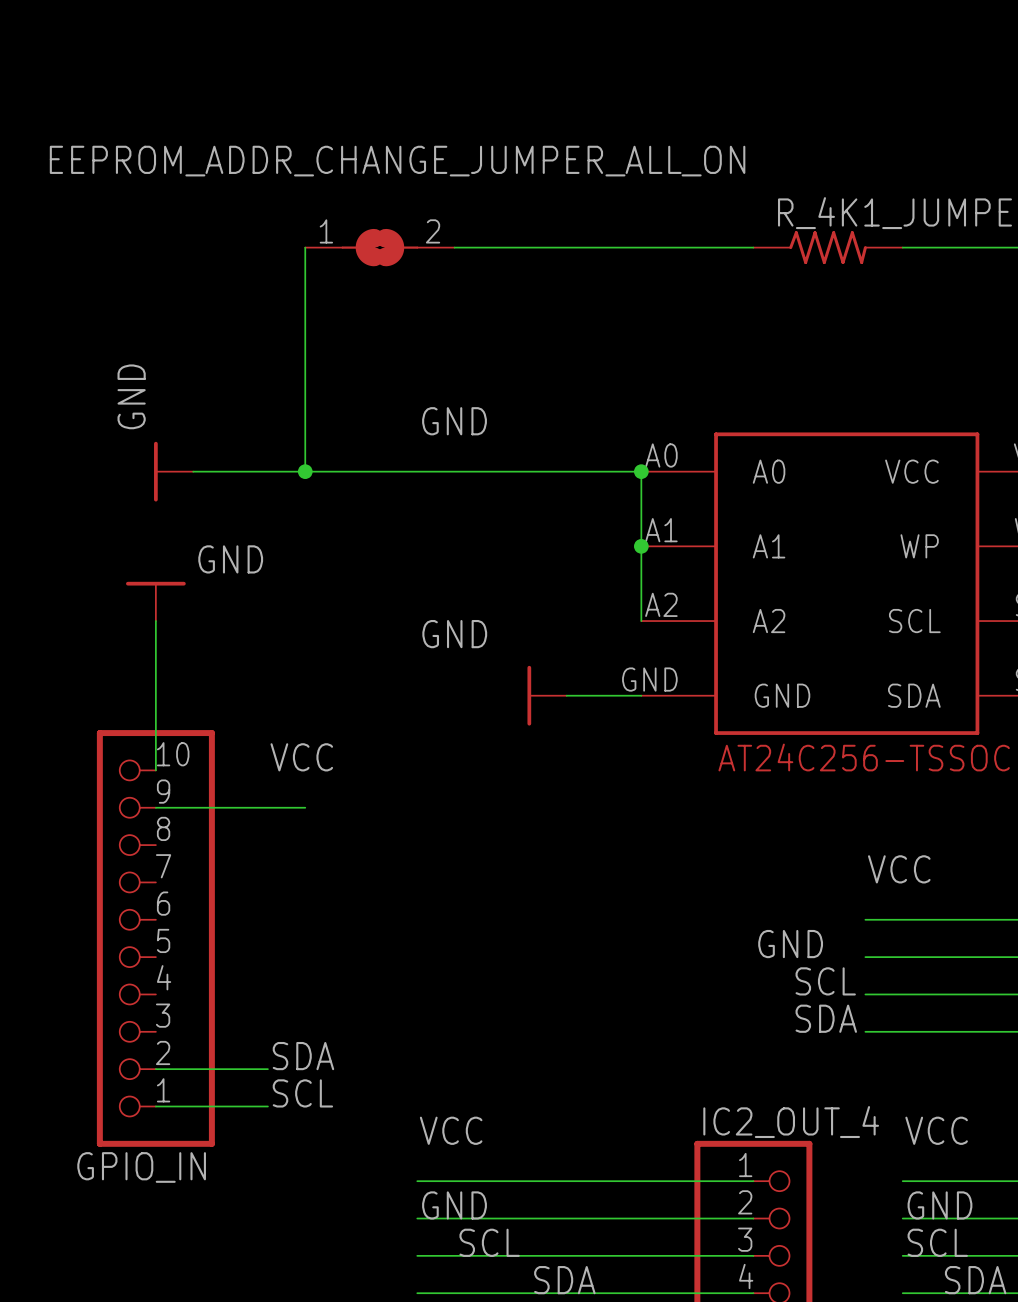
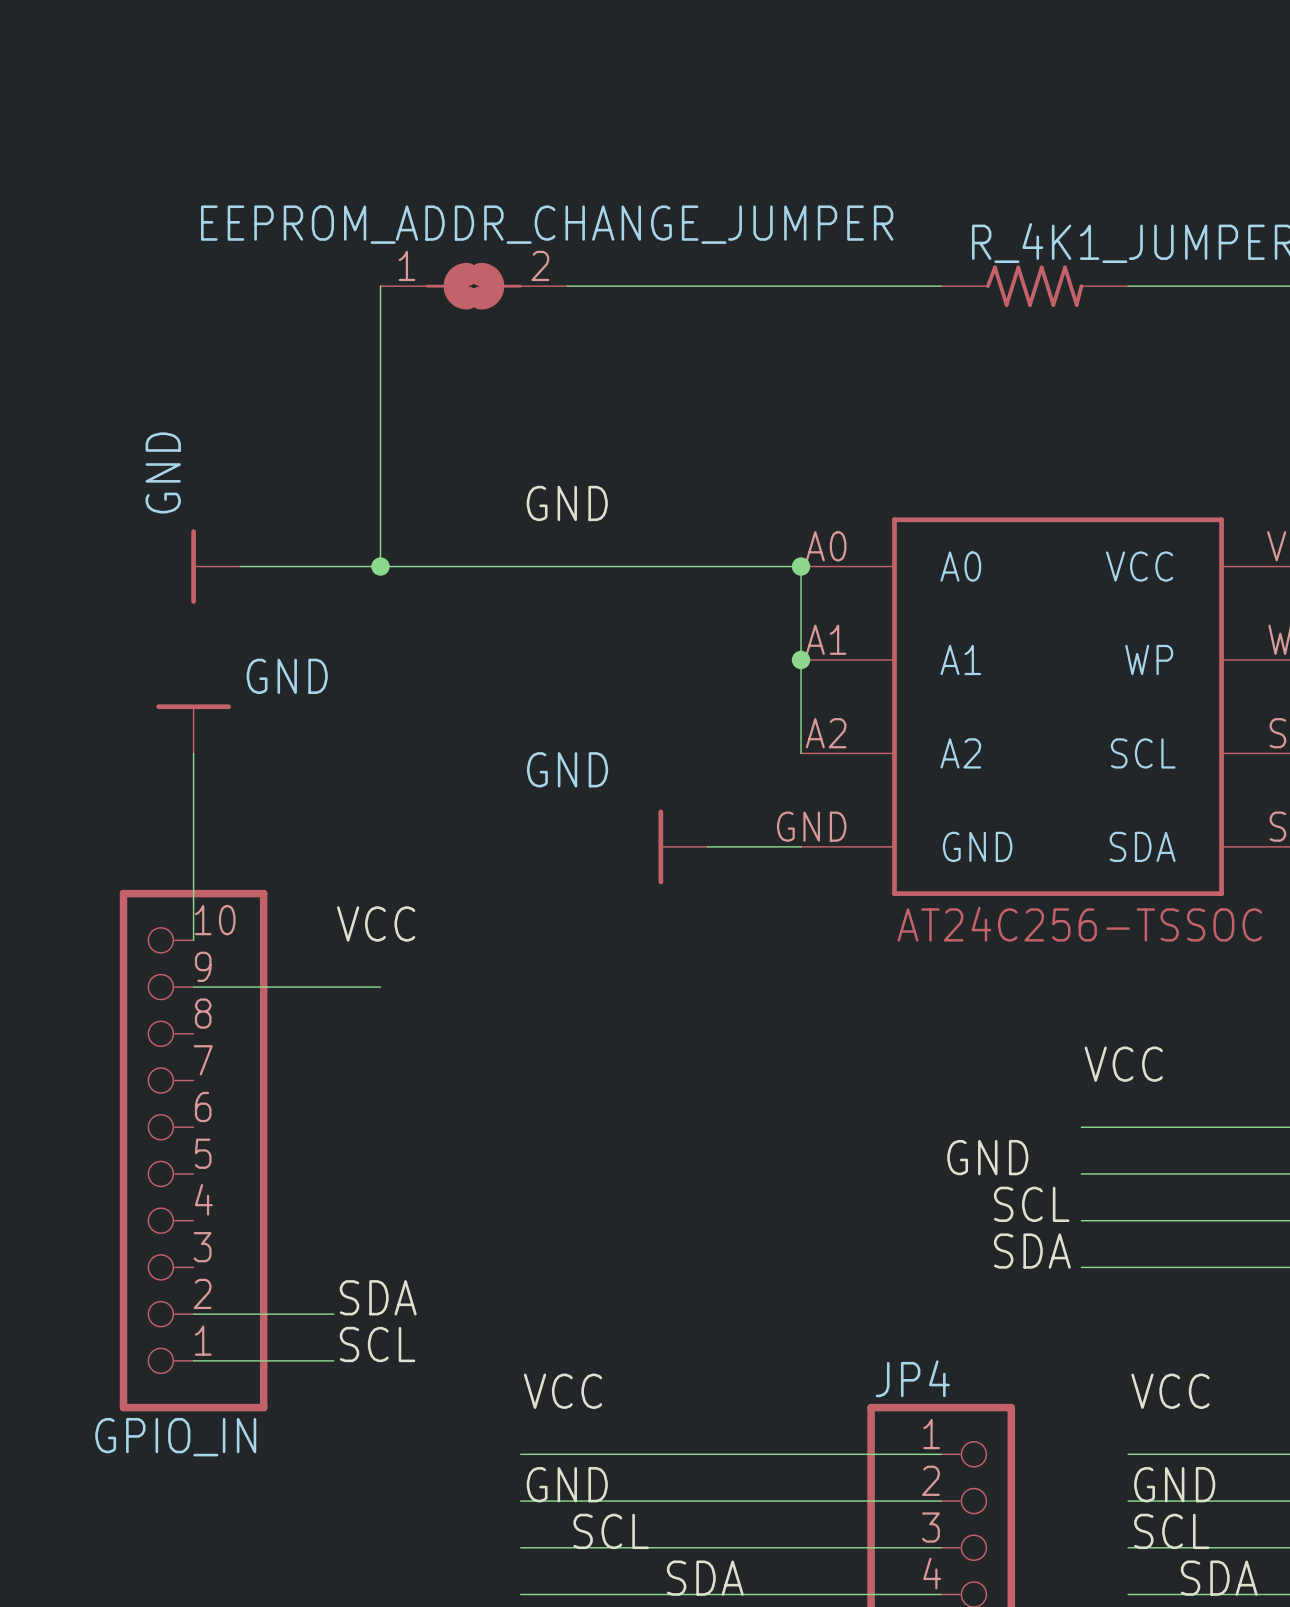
EEPROM_ADDR_CHANGE_JUMPER name: EEPROM_ADDR_CHANGE_JUMPER_ALL_ON (397, 161) -> EEPROM_ADDR_CHANGE_JUMPER (547, 224)
IC2_OUT_4 name: IC2_OUT_4 (791, 1122) -> JP4 (912, 1378)

